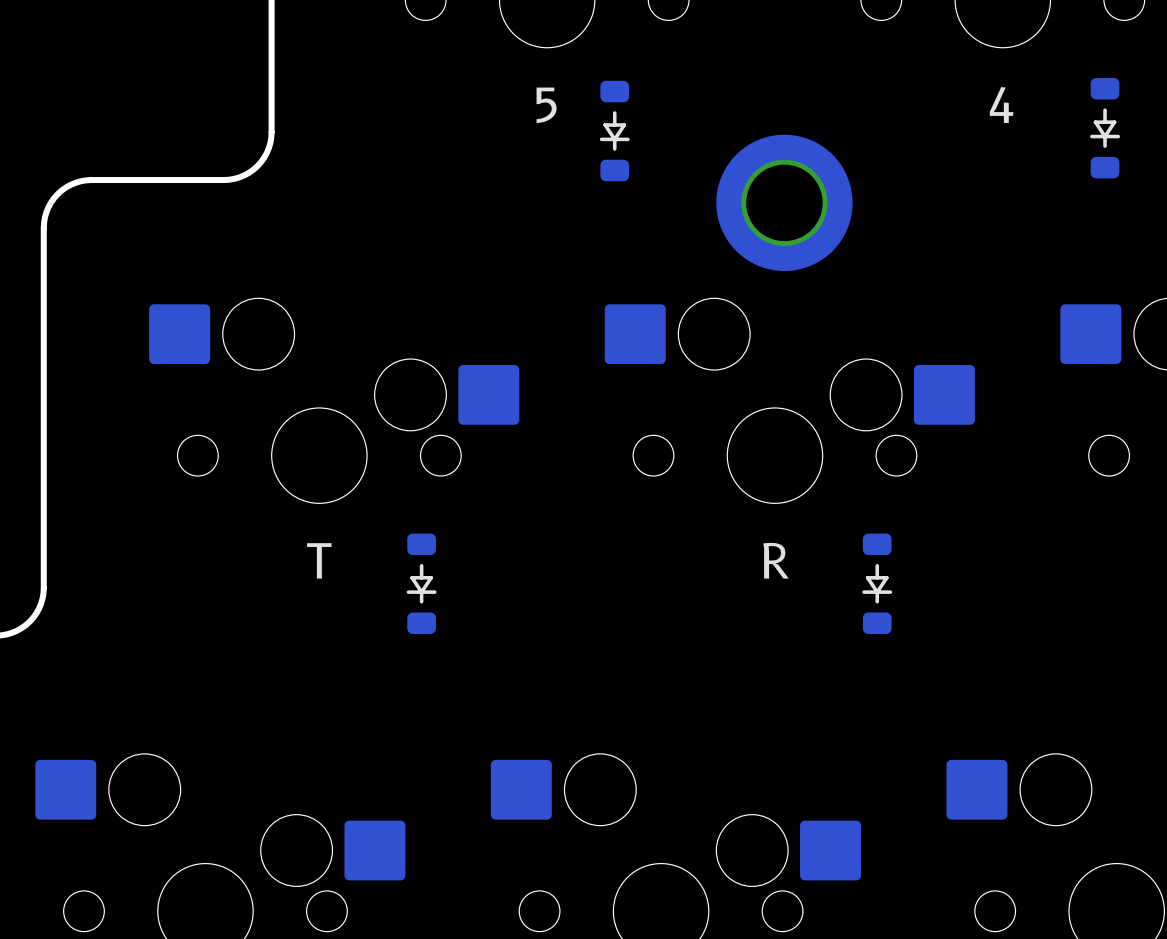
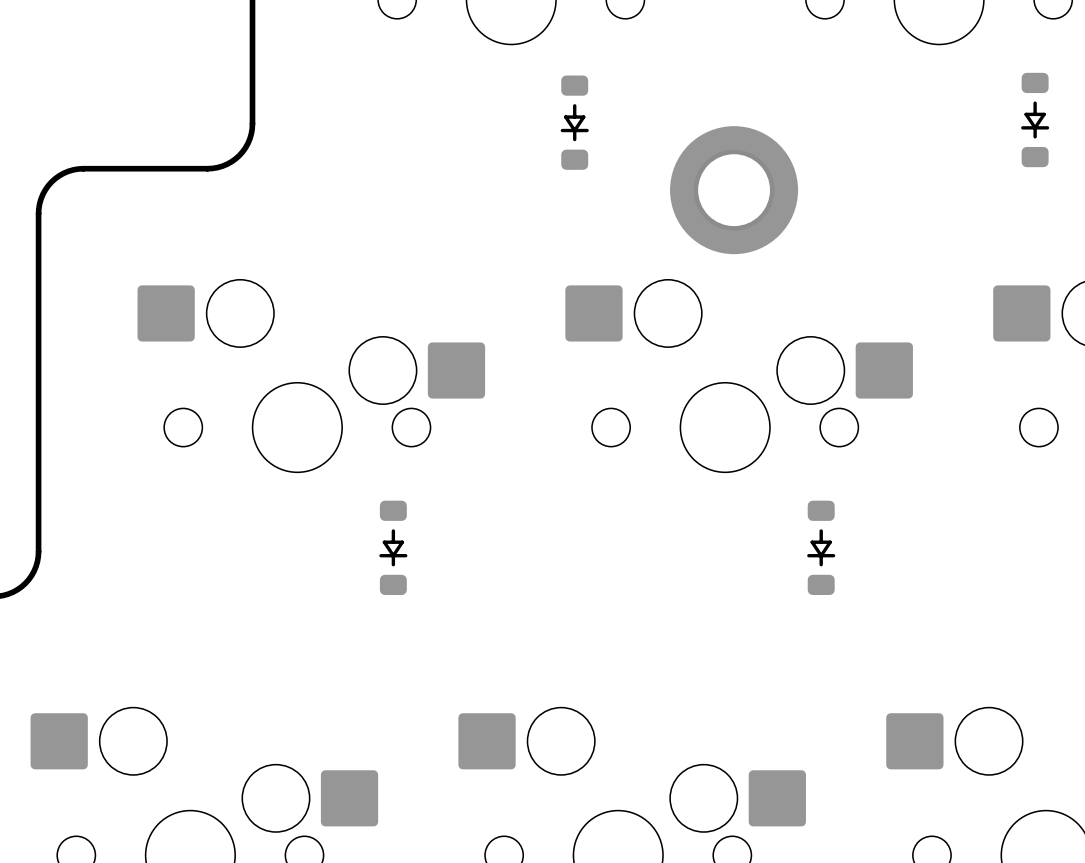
part text: 5 (546, 105) -> none
part text: 4 (1001, 105) -> none
part text: T (319, 560) -> none
part text: R (776, 560) -> none

